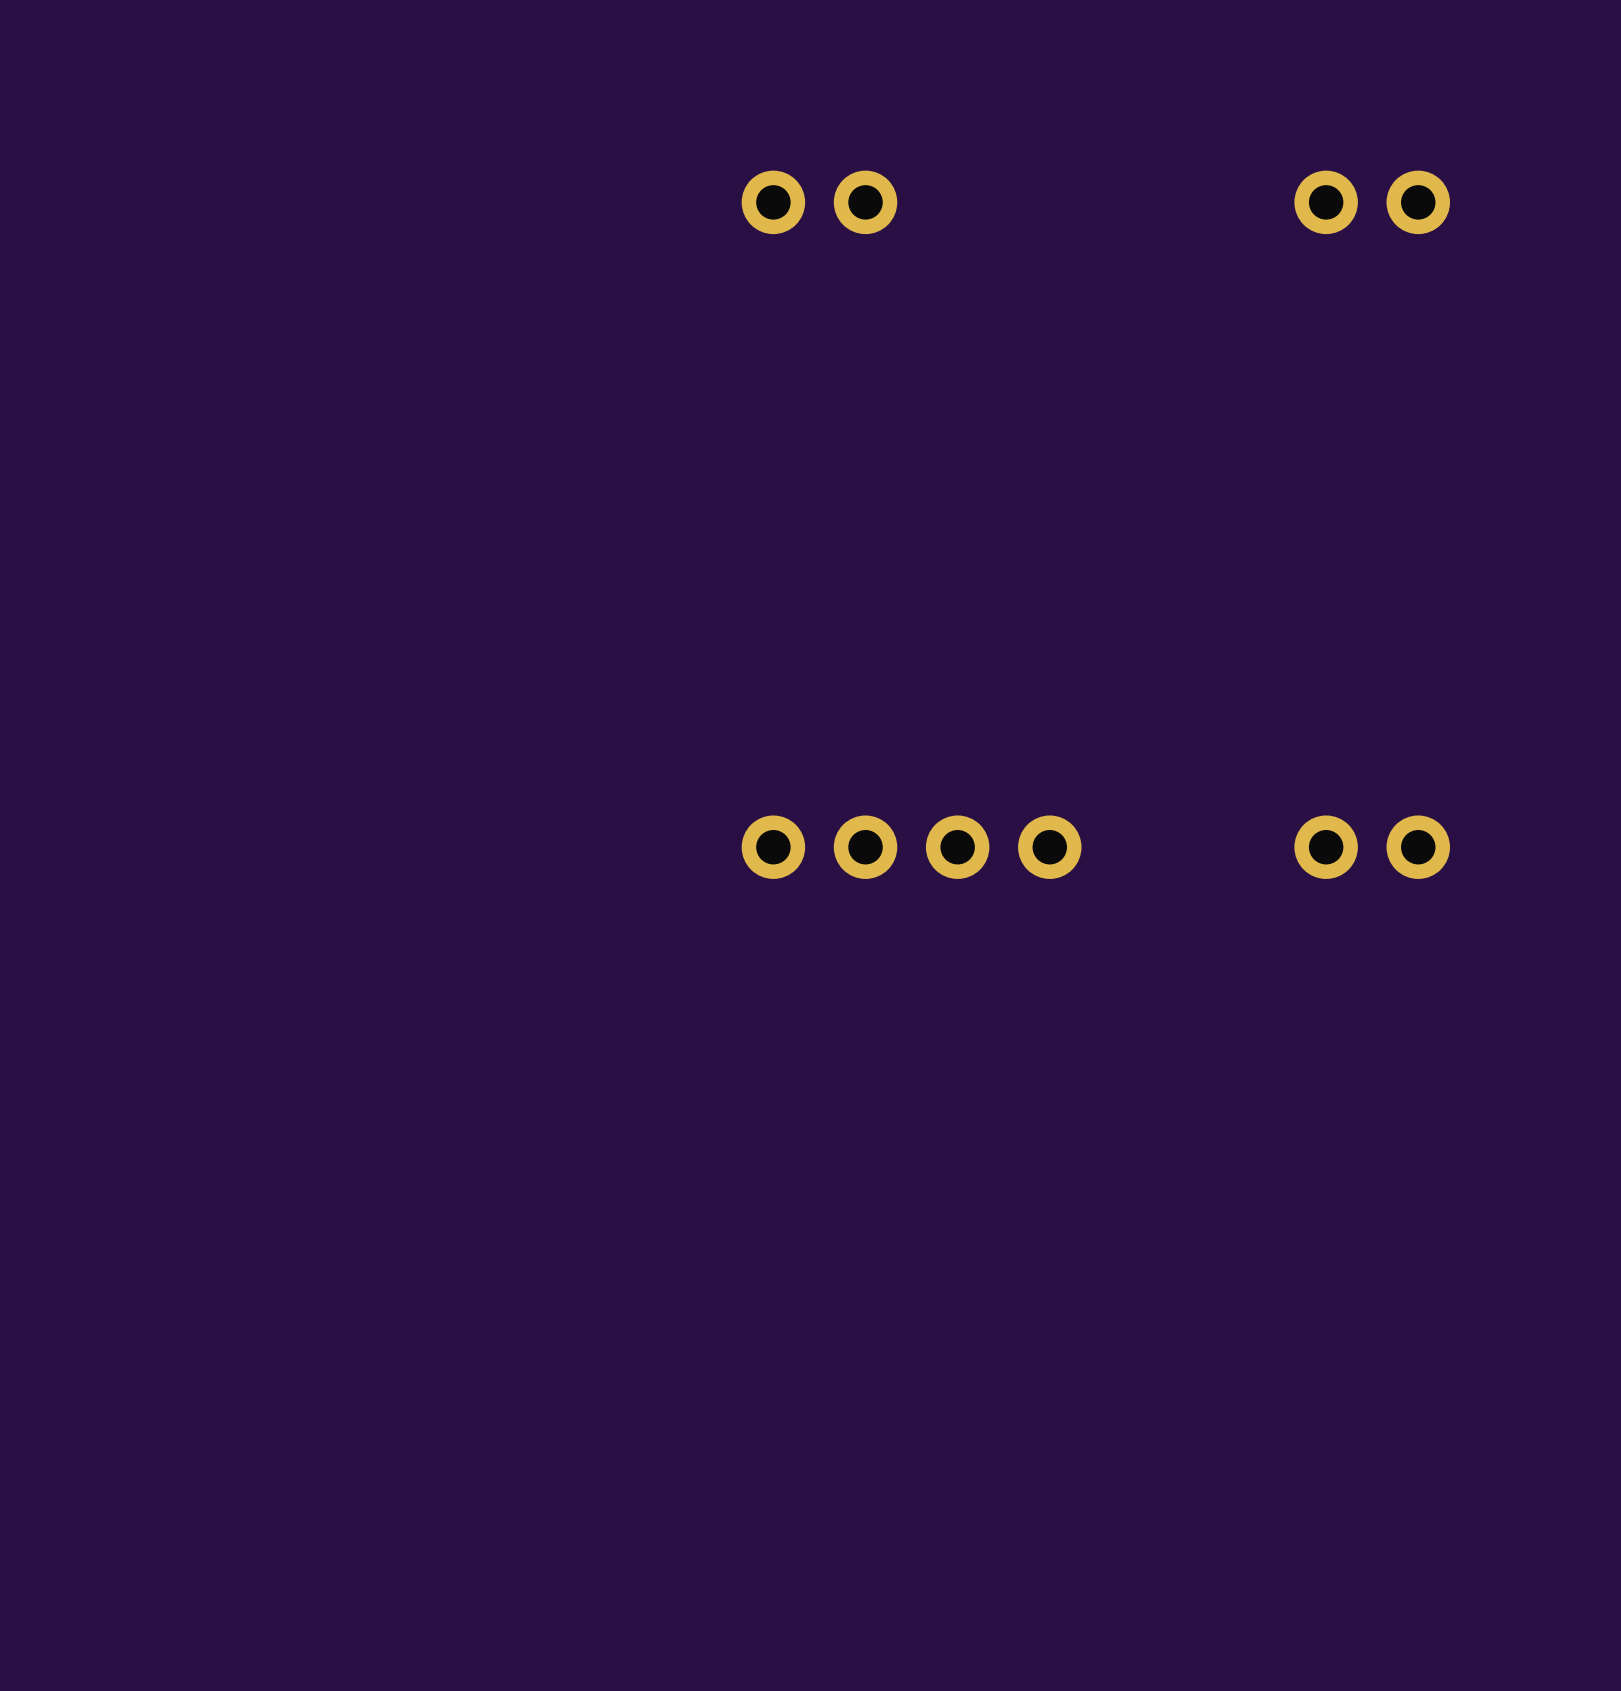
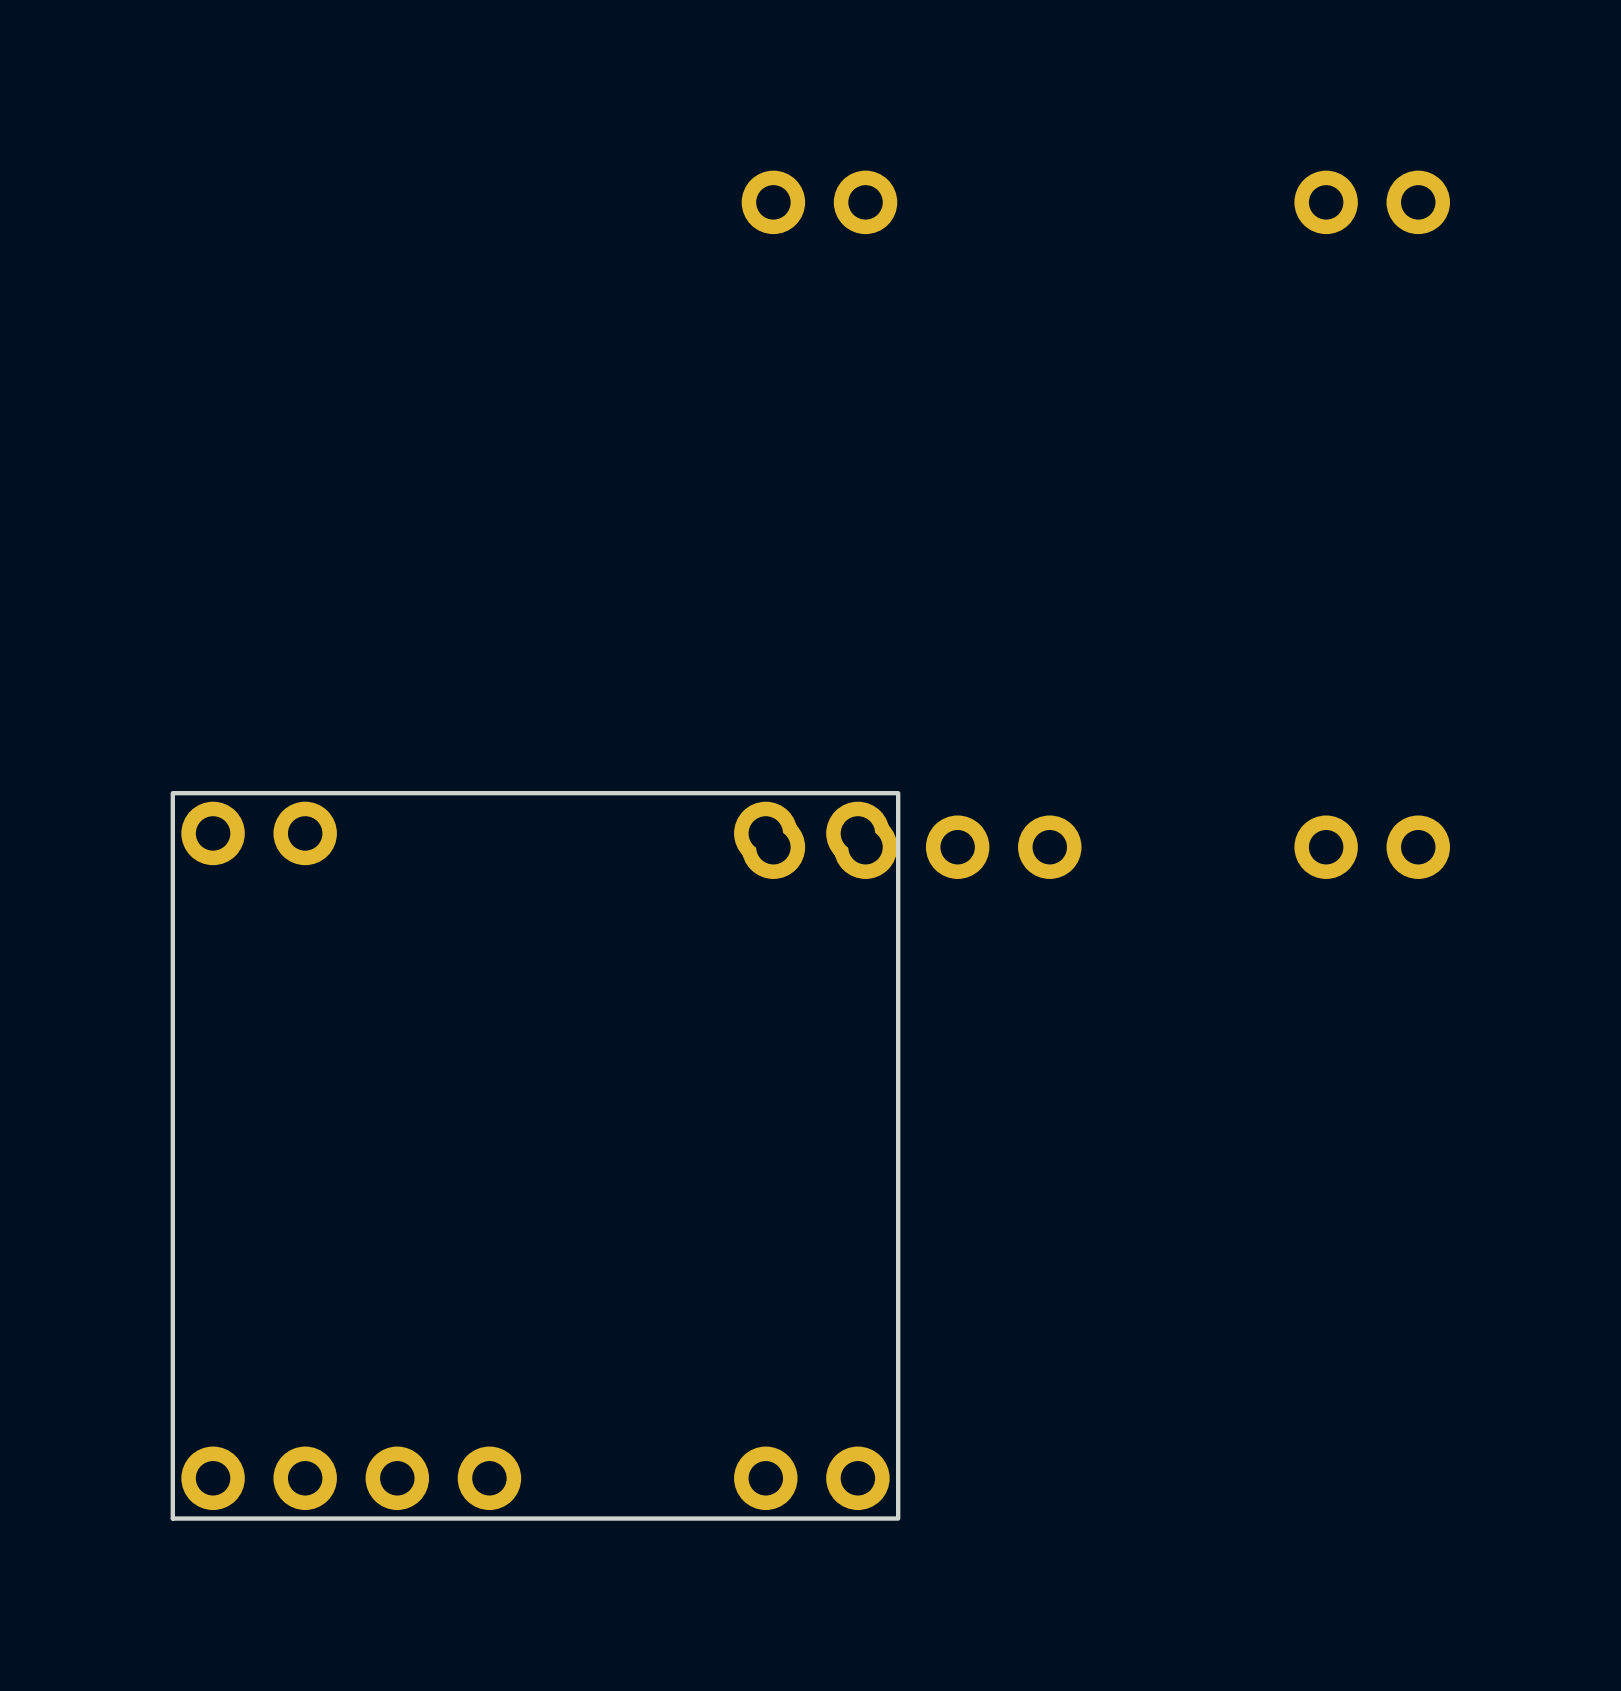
part: none -> (535, 1155)

